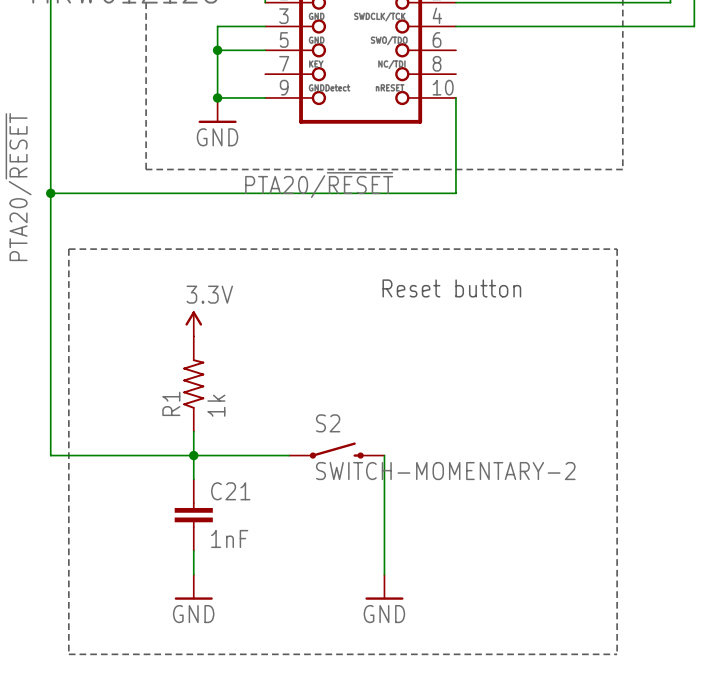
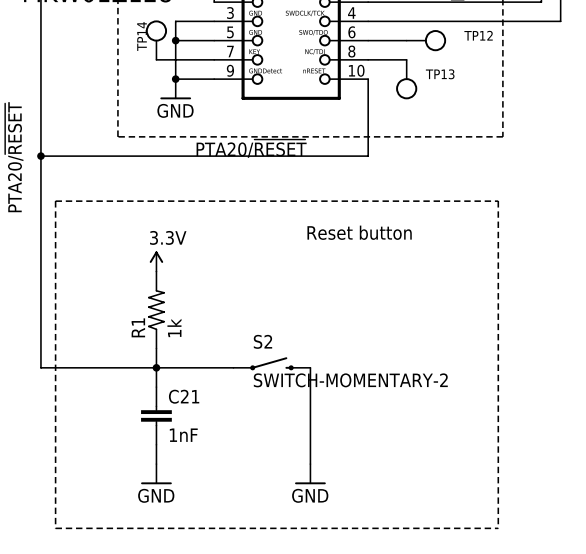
TP14: none -> (156, 40)
wire: none -> (368, 40) (406, 40)
TP12: none -> (426, 40)
wire: none -> (156, 59) (214, 59)
wire: none -> (368, 59) (406, 59)
TP13: none -> (406, 79)

